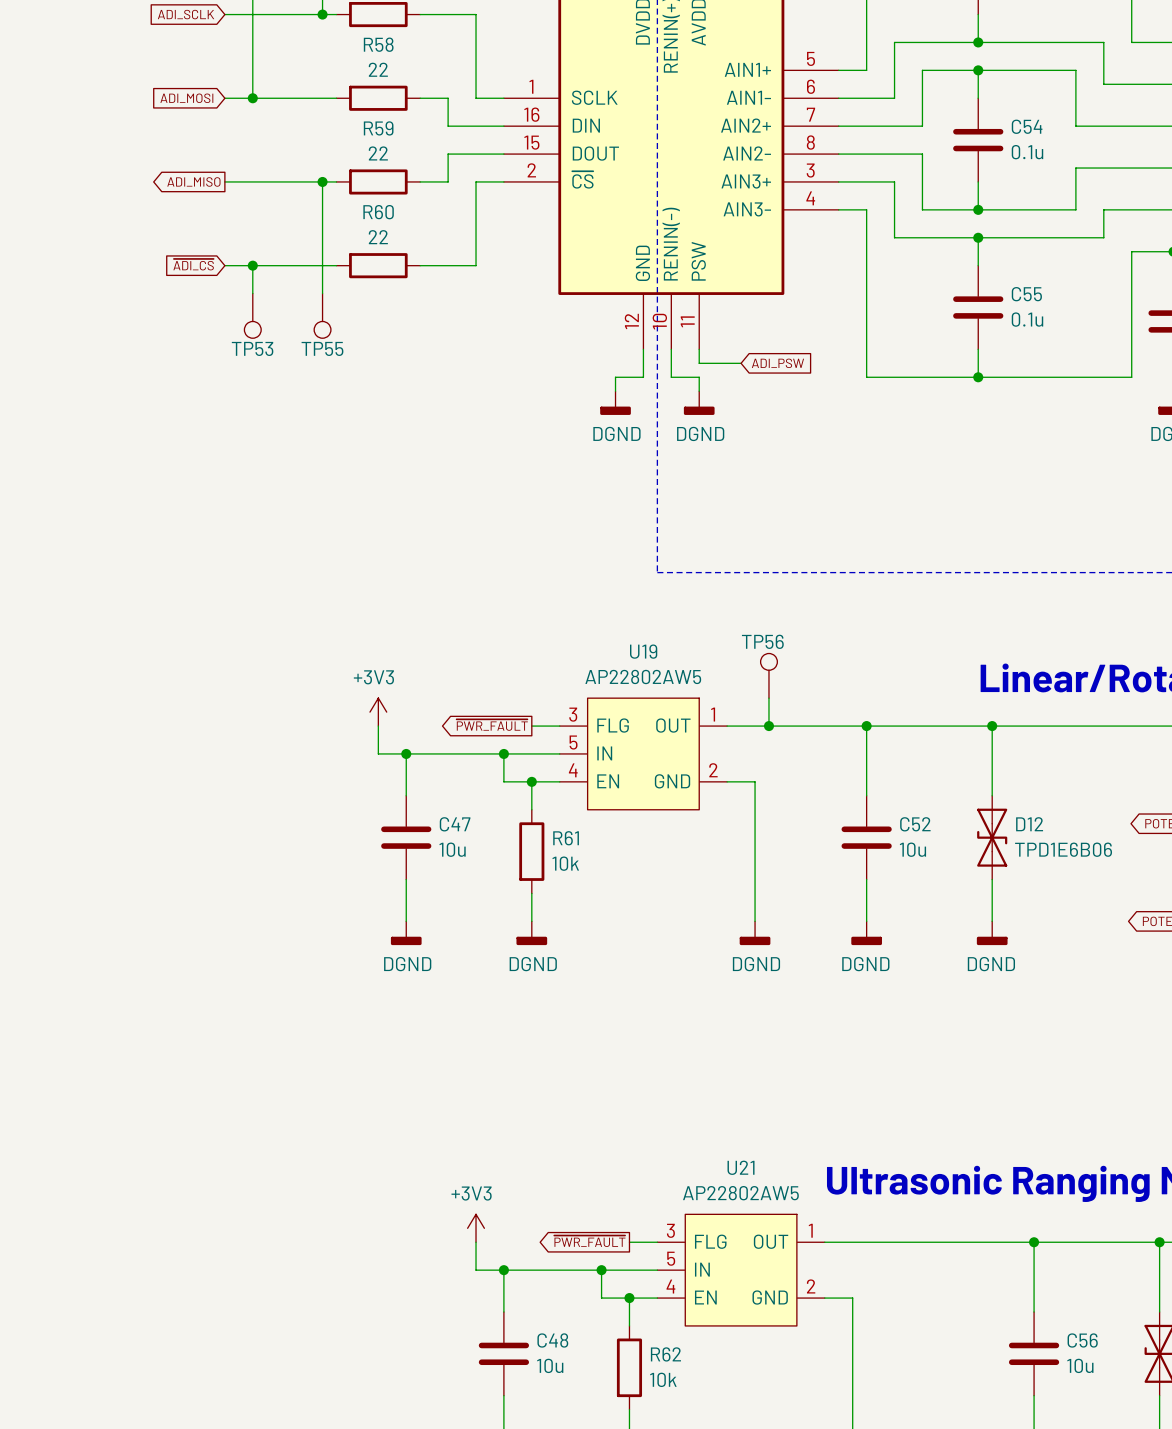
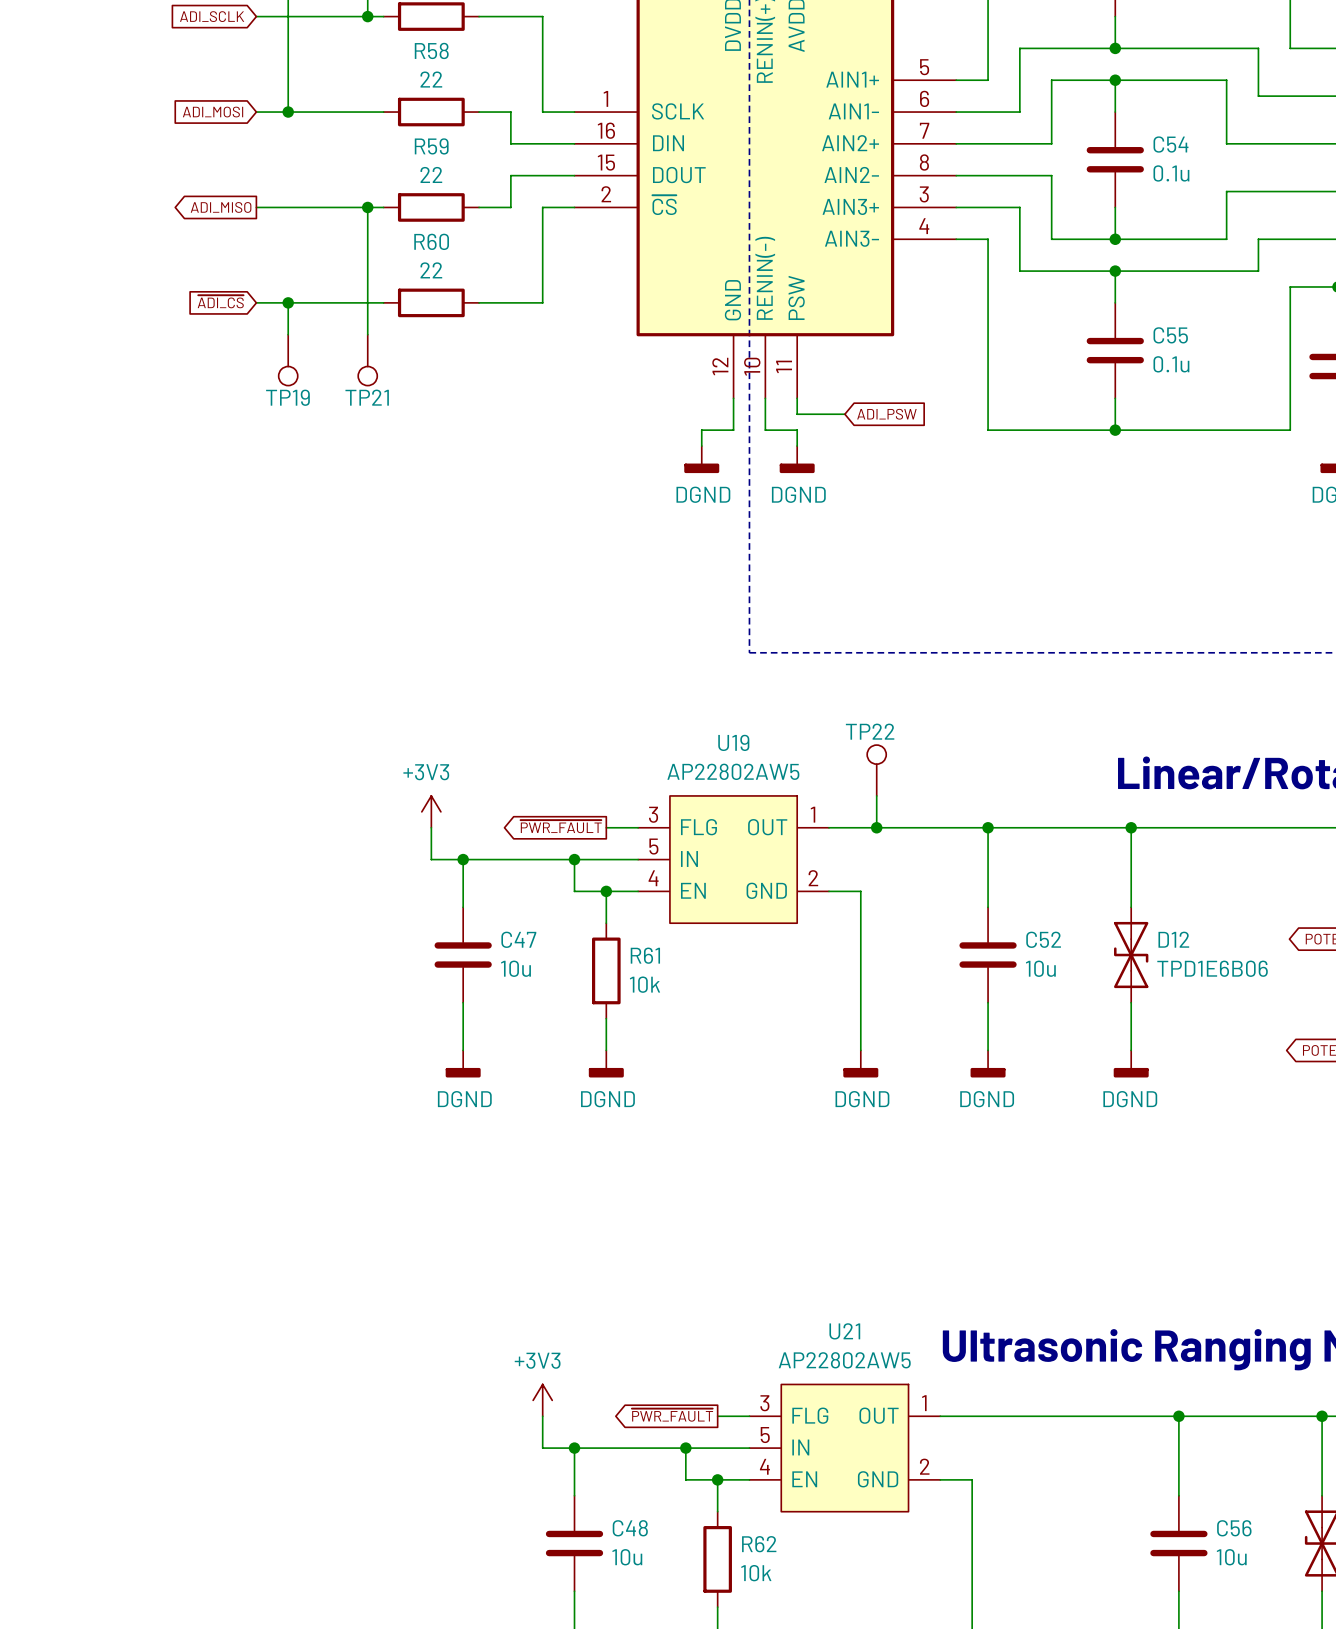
TP53 name: TP53 (252, 348) -> TP19 (287, 397)
TP55 name: TP55 (322, 348) -> TP21 (367, 397)
TP56 name: TP56 (762, 641) -> TP22 (870, 731)

